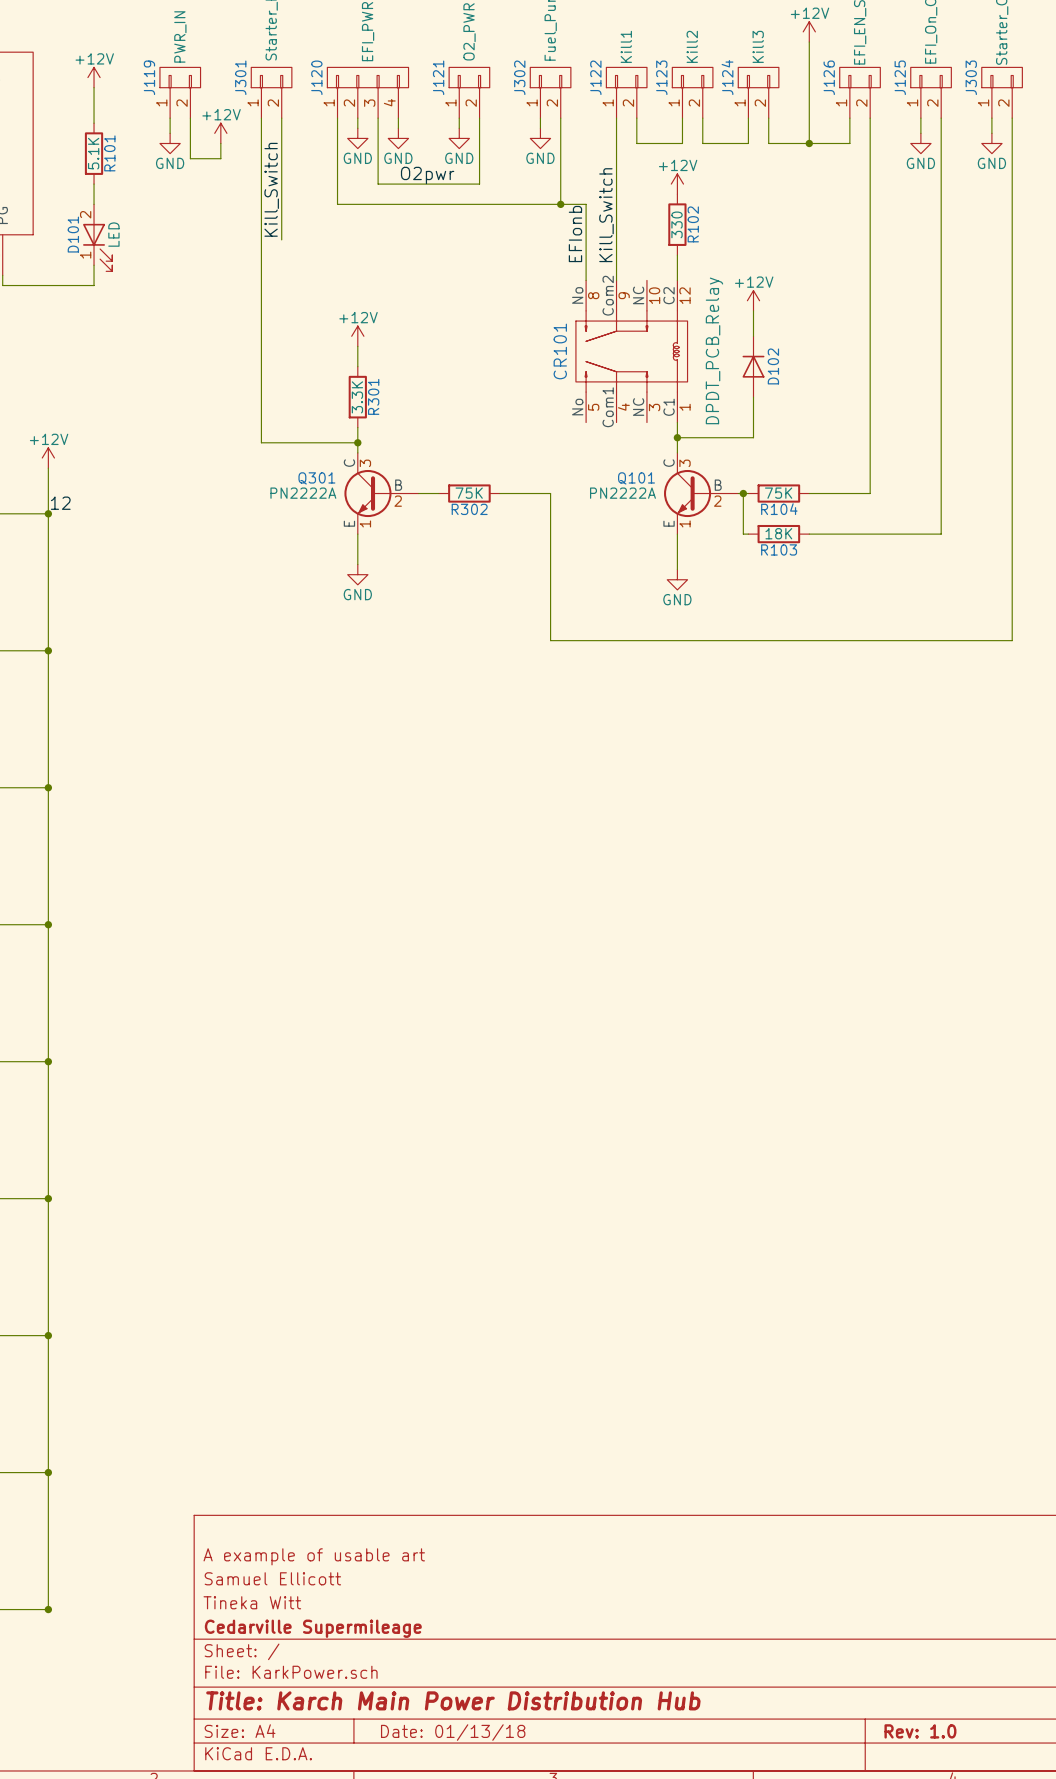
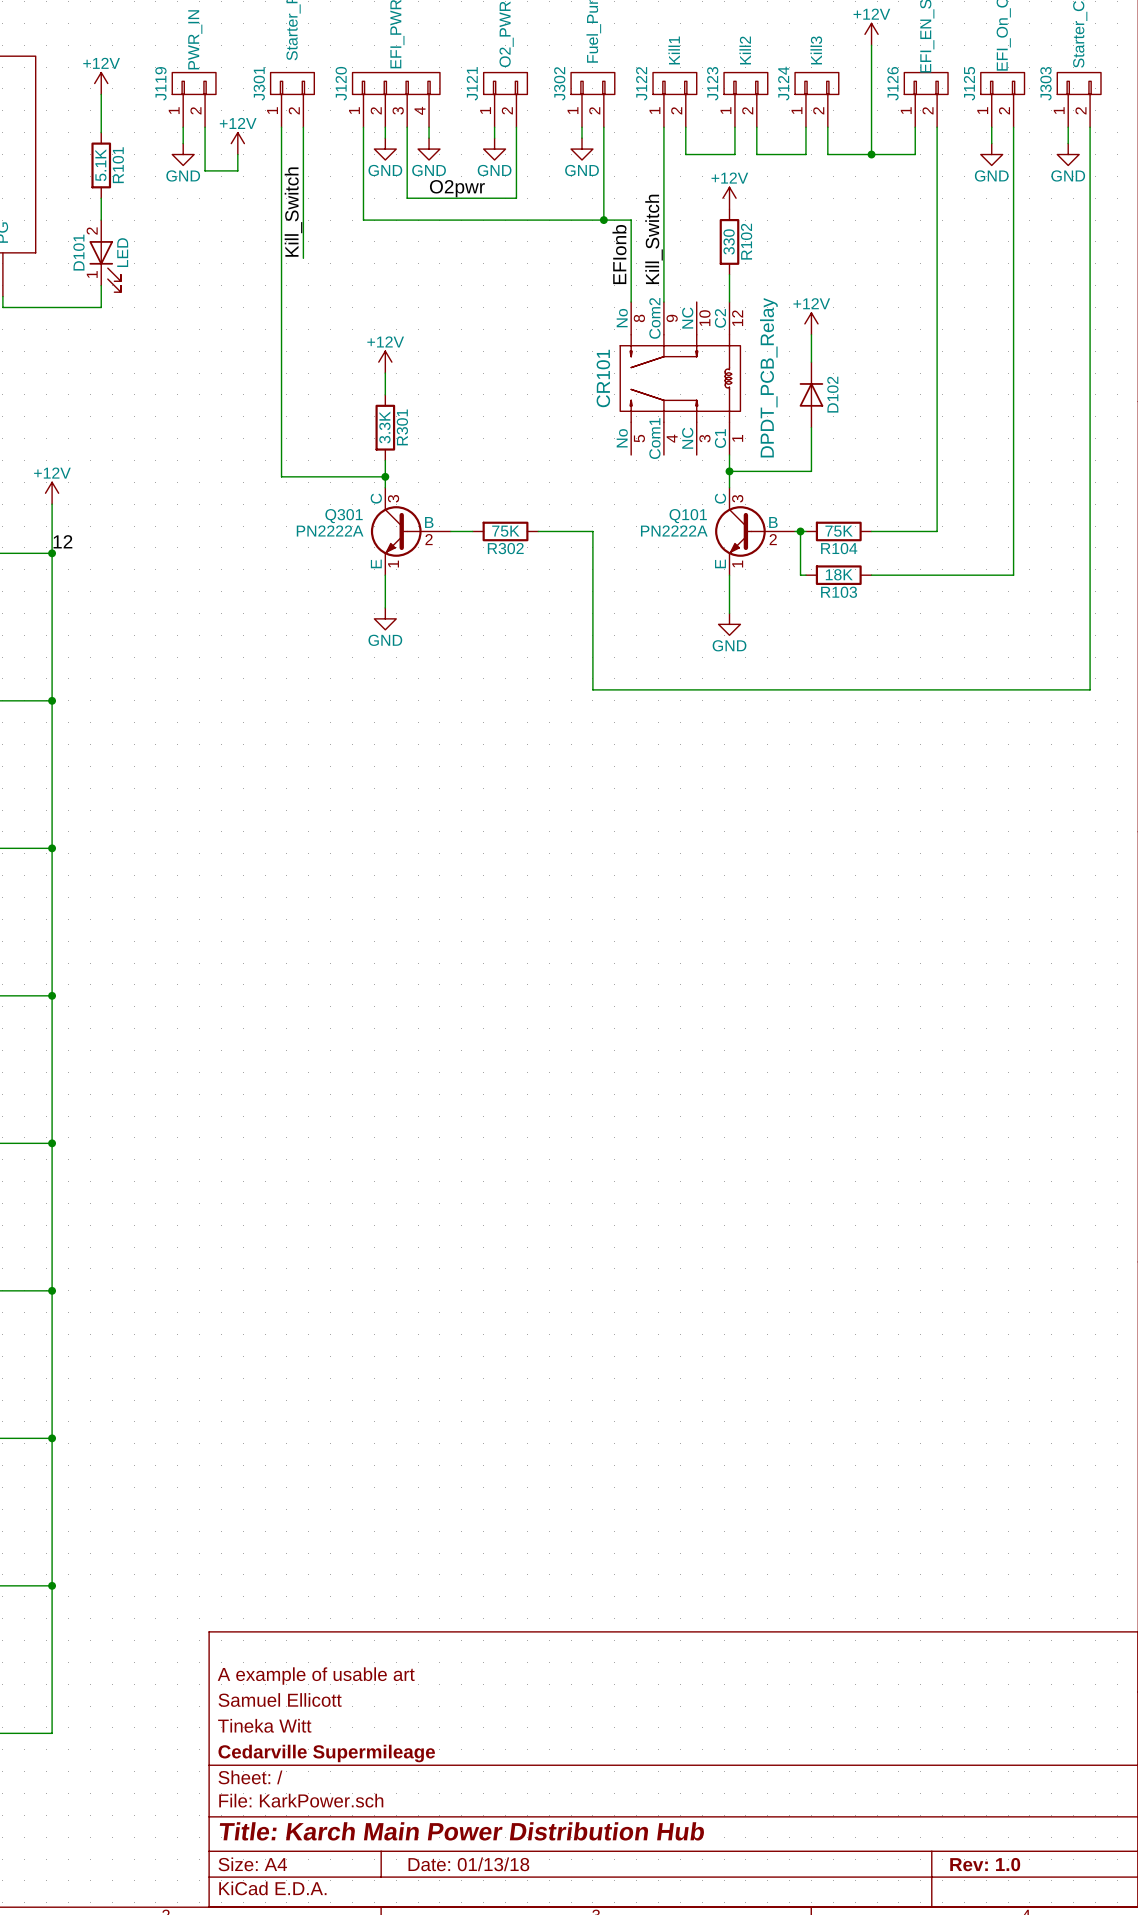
junction: (48, 1609) -> none

